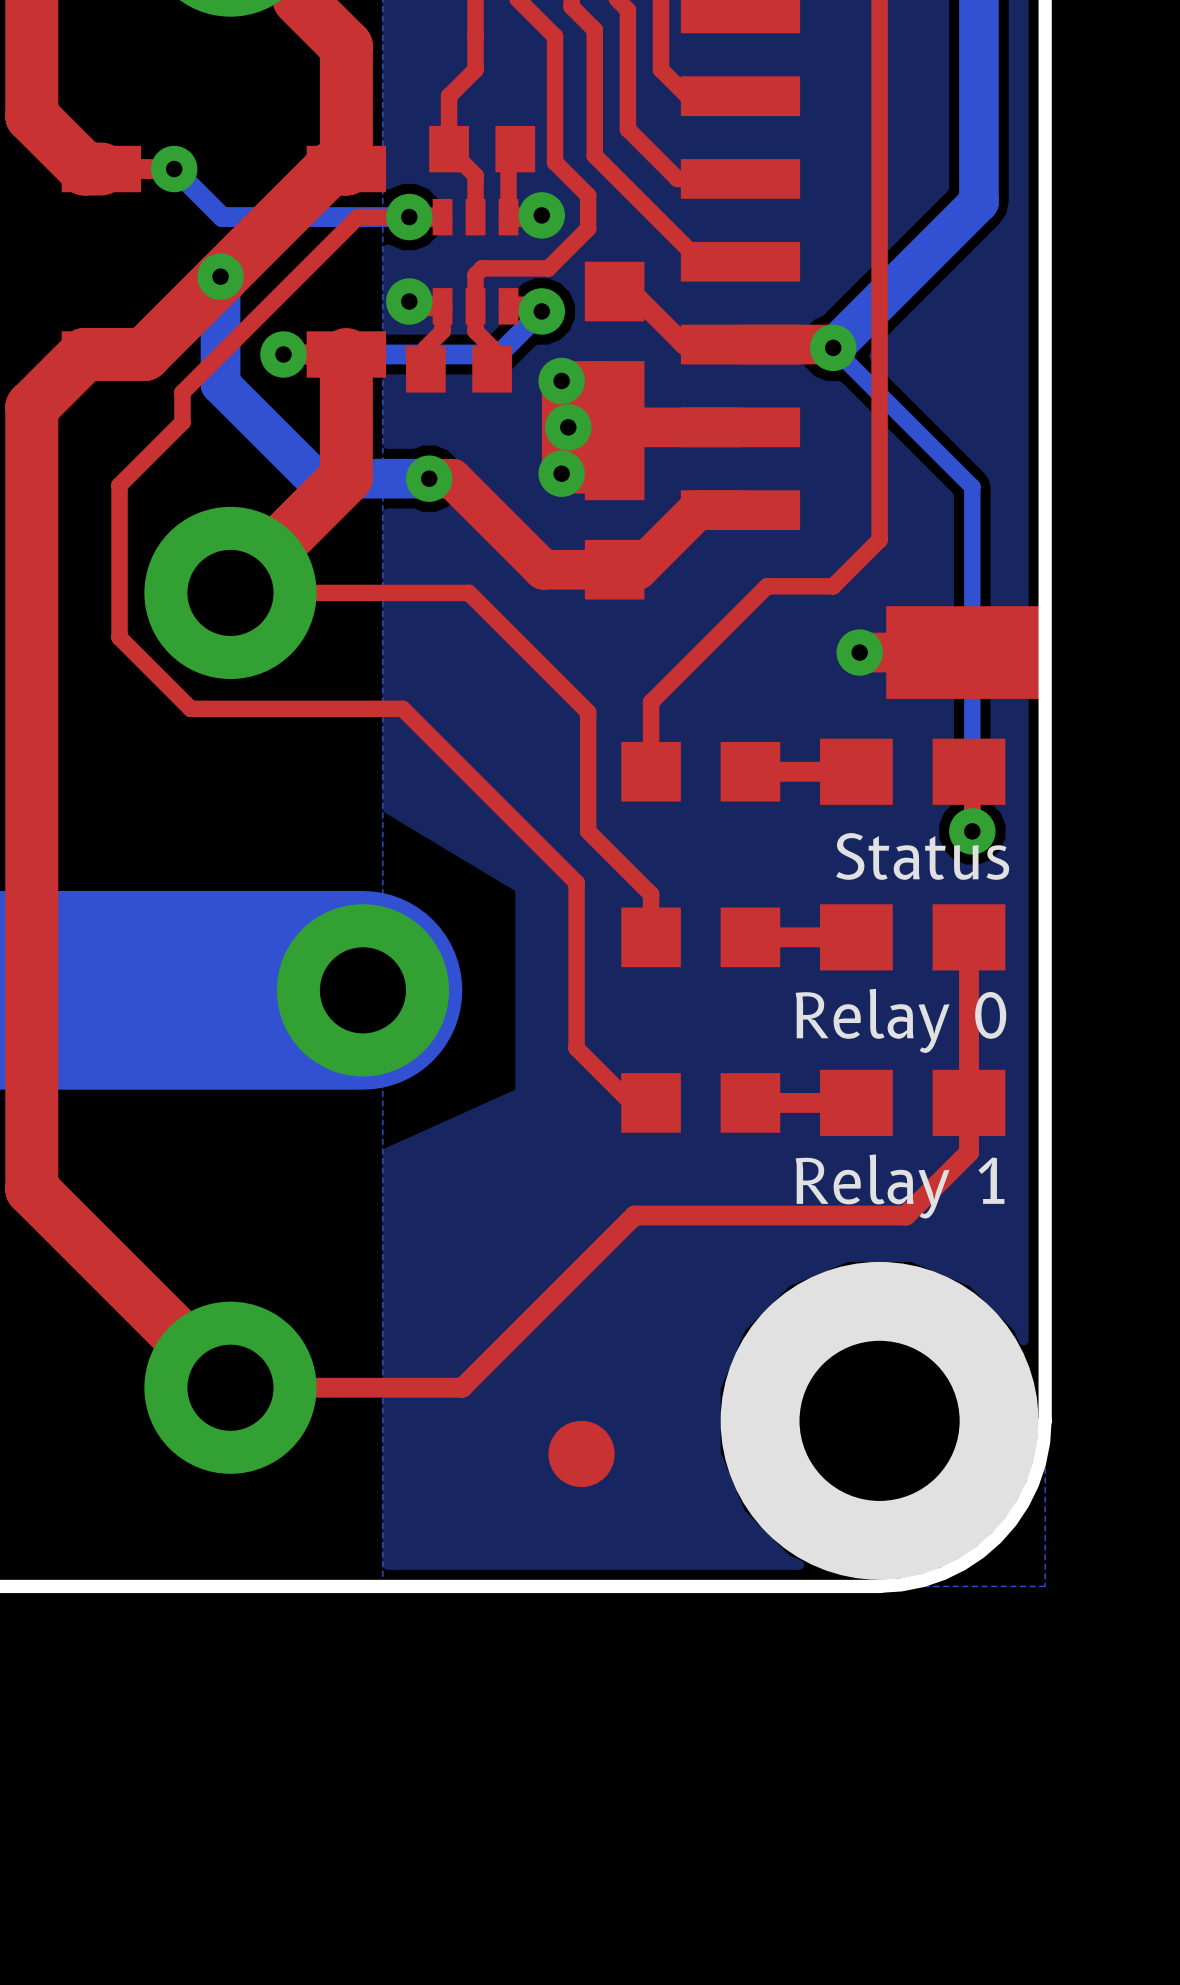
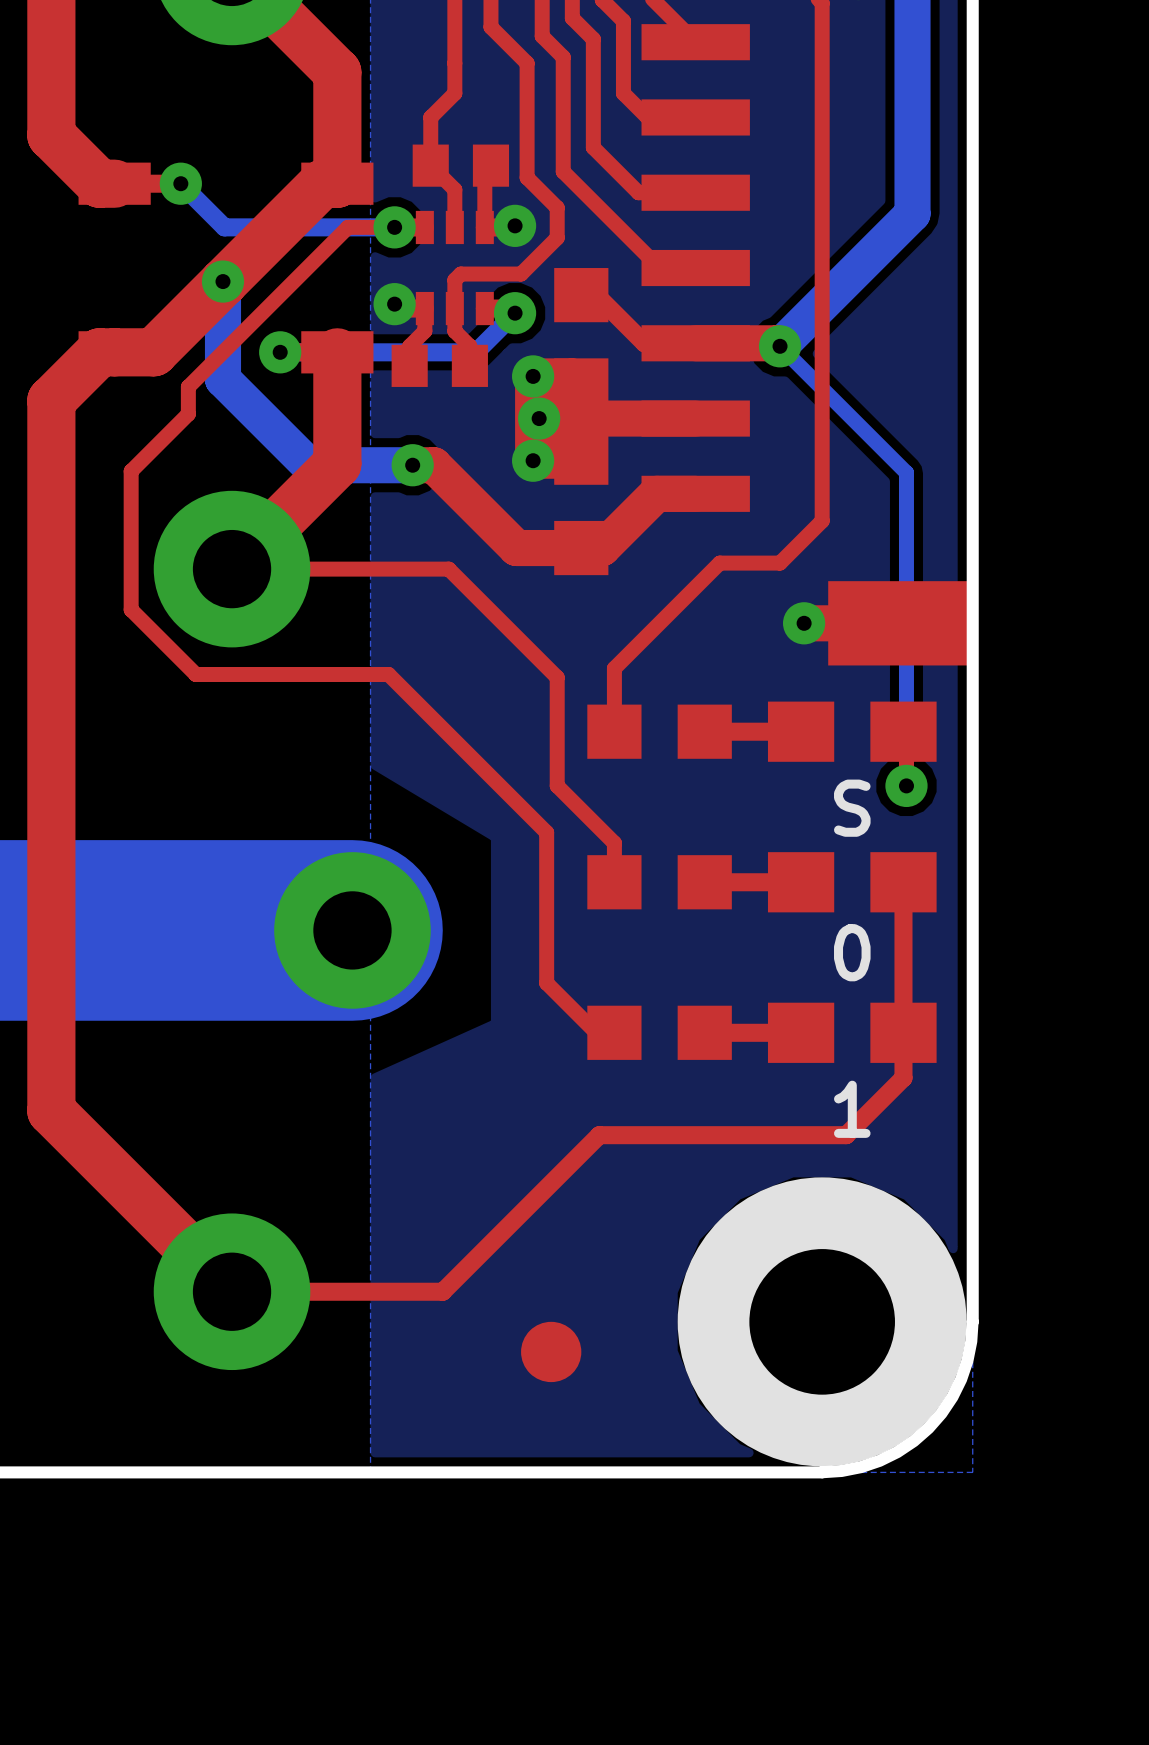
text: none -> S (852, 808)
text: Status (922, 856) -> none
text: none -> 0 (852, 952)
text: Relay 0 (900, 1020) -> none
text: Relay 1 (900, 1186) -> none
text: none -> 1 (852, 1109)

